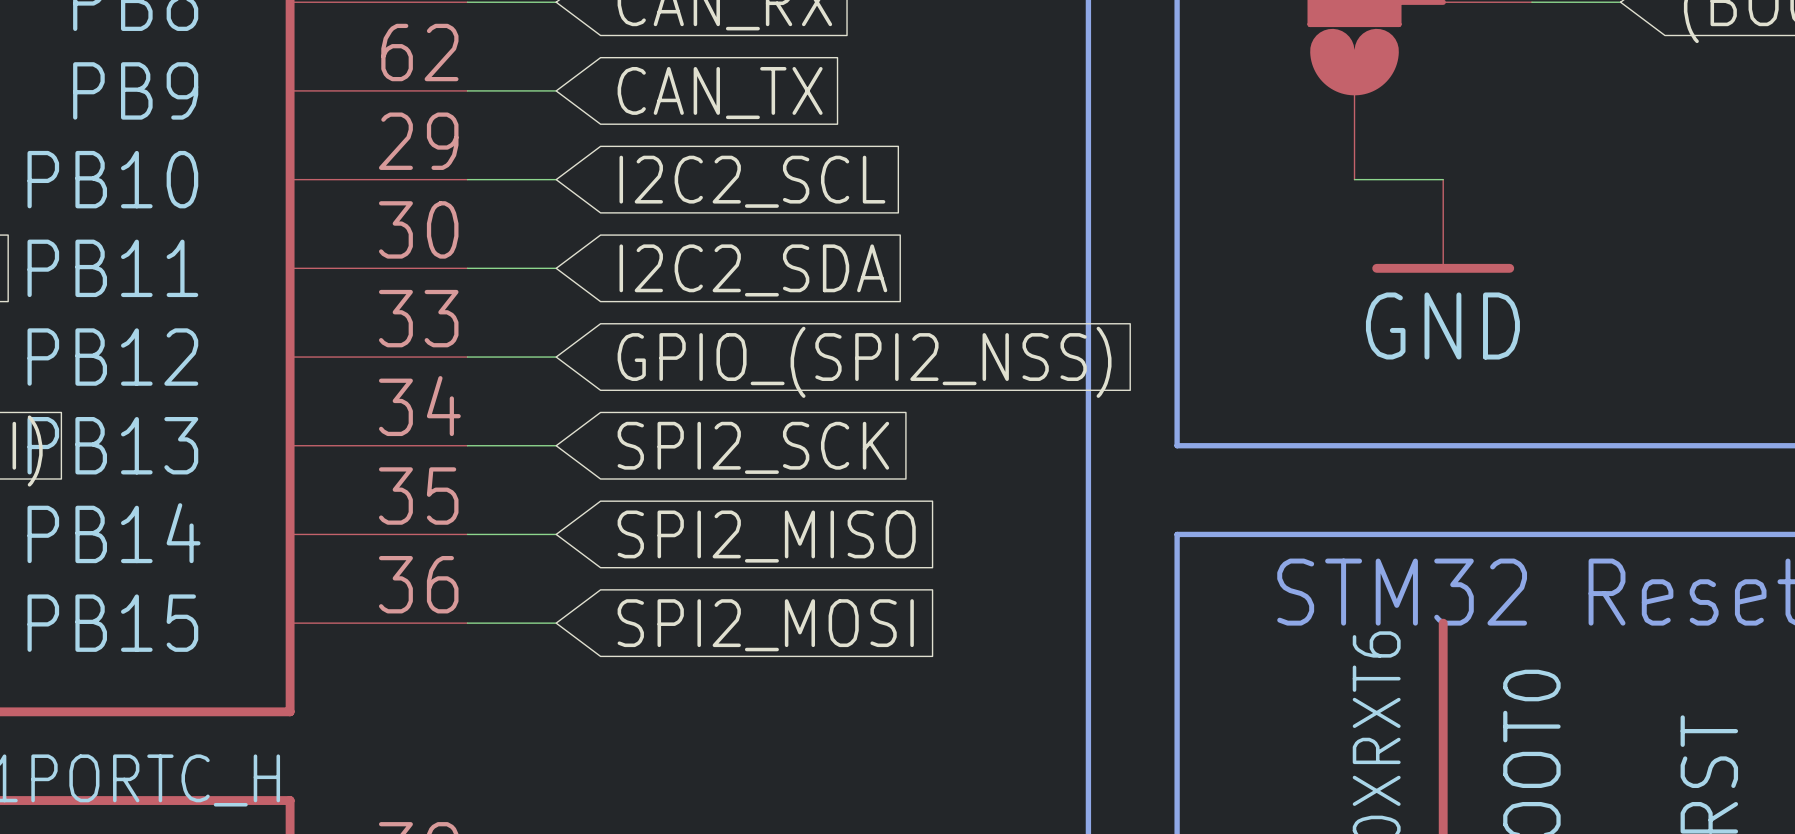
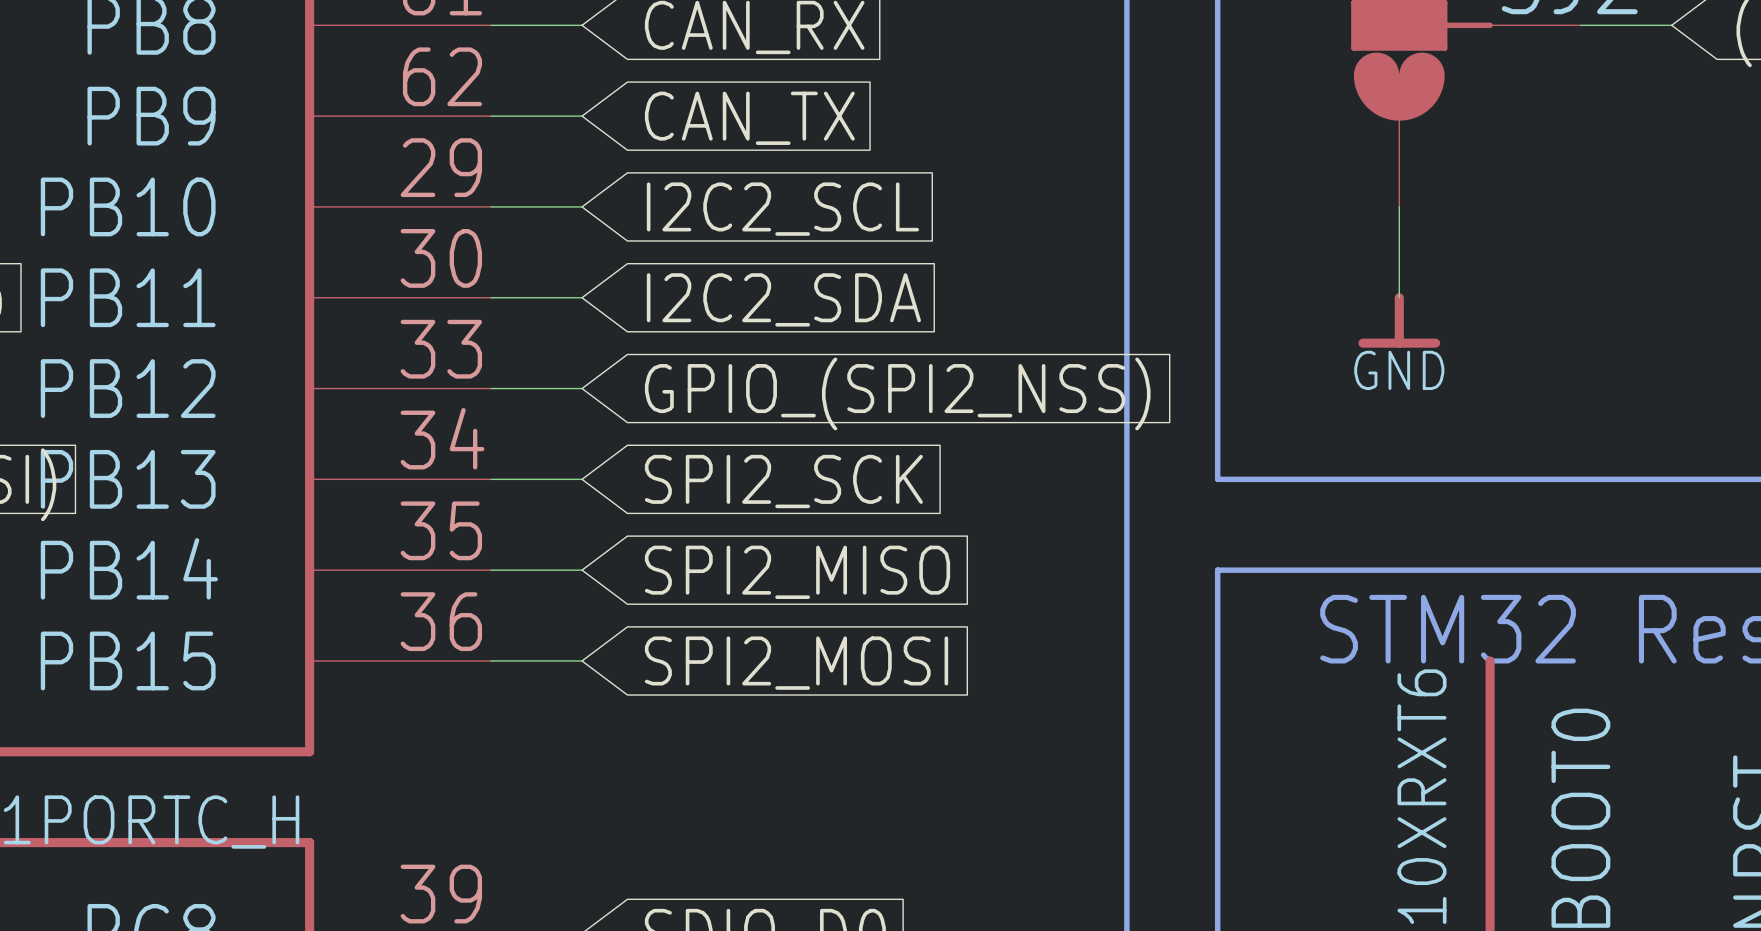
wire: (1354, 179) (1443, 179) -> (1399, 206) (1399, 297)
power symbol: GND (1443, 226) -> none
power symbol: none -> GND (1399, 320)

